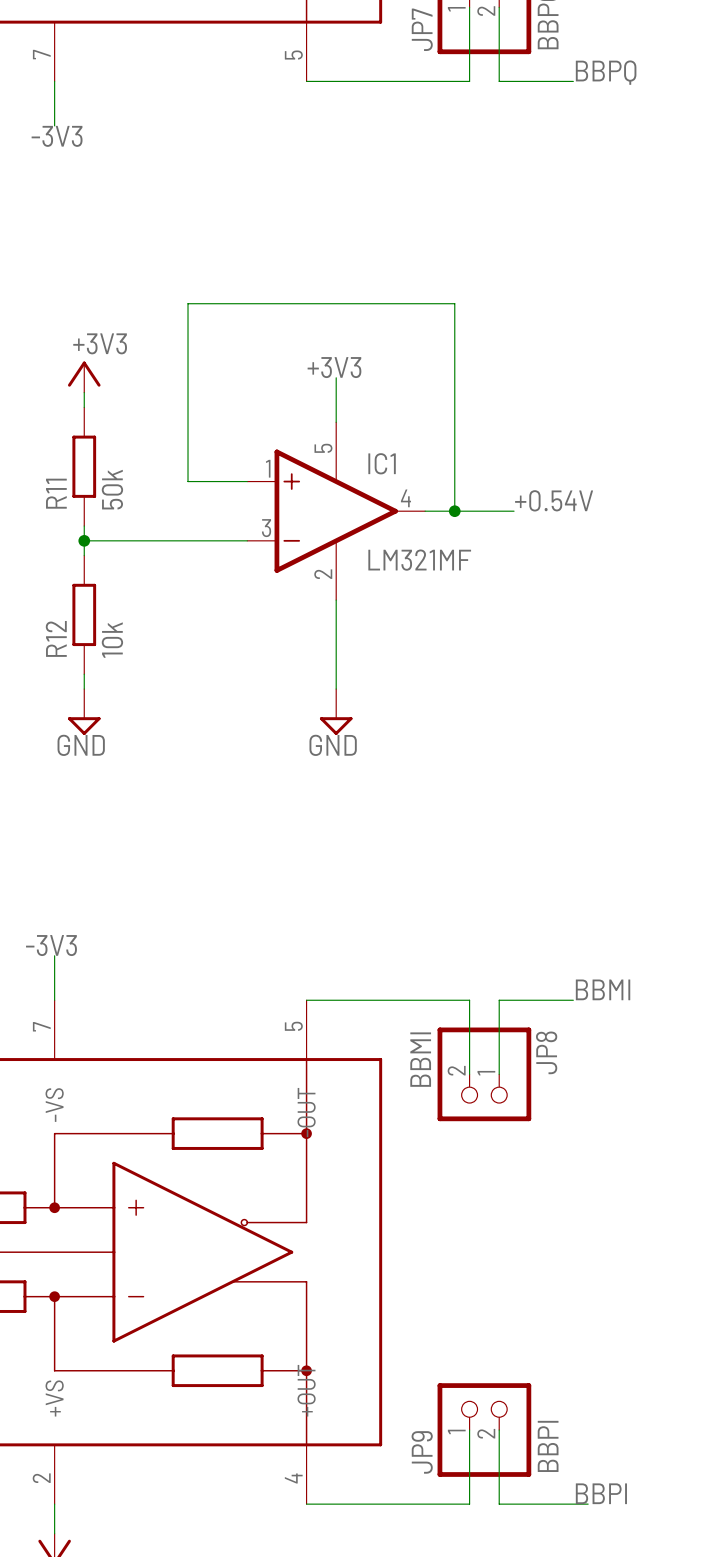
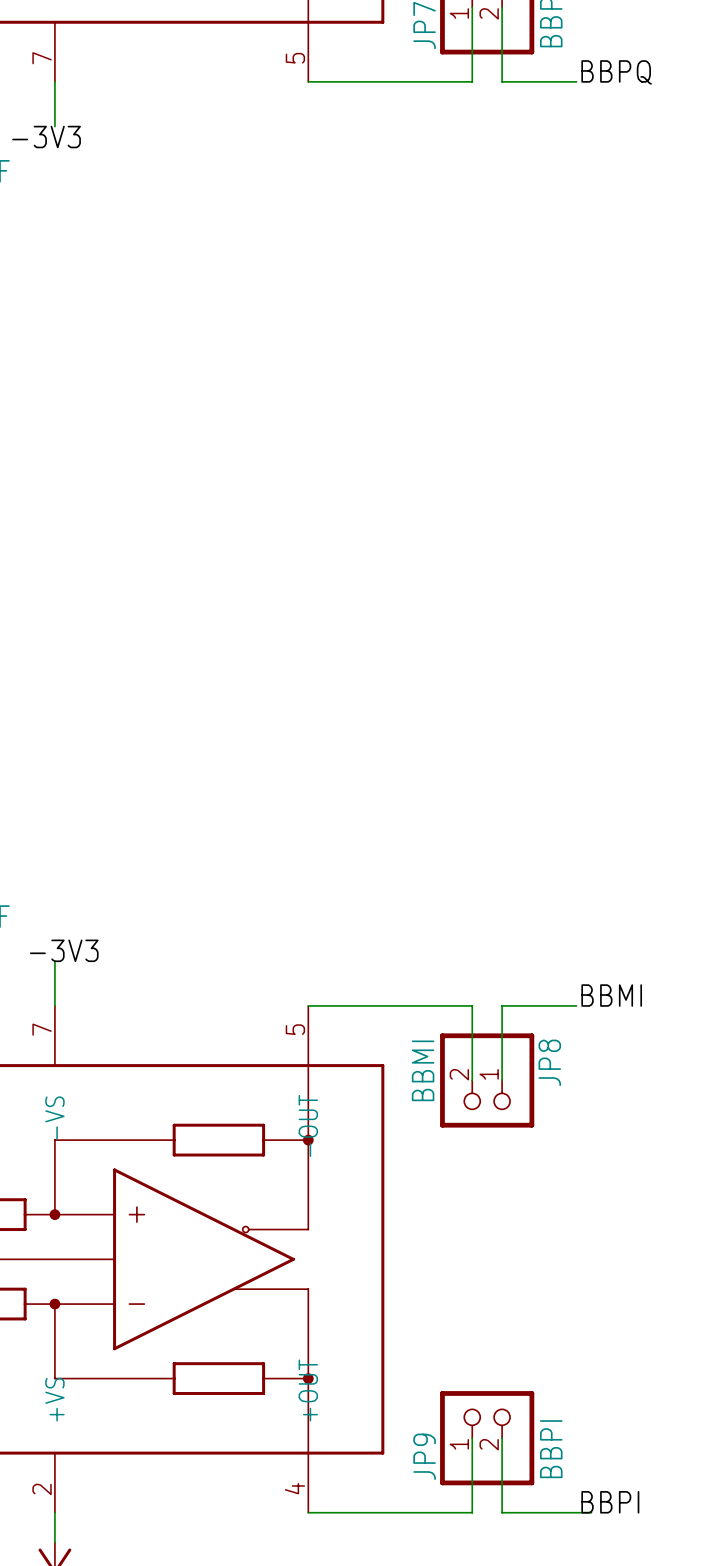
label: +3V3 (334, 367) -> none
power symbol: +3V3 (84, 377) -> none
wire: (336, 377) (336, 422) -> none
wire: (84, 392) (84, 407) -> none
R11: 50k (84, 466) -> none
wire: (247, 481) (188, 481) (188, 303) (454, 303) (454, 511) -> none
label: +0.54V (554, 500) -> none
IC1: LM321MF (336, 511) -> none
wire: (425, 511) (514, 511) -> none
junction: (454, 511) -> none
wire: (84, 526) (84, 555) -> none
wire: (84, 540) (247, 540) -> none
junction: (84, 540) -> none
wire: (336, 600) (336, 689) -> none
R12: 10k (84, 614) -> none
wire: (84, 674) (84, 689) -> none
power symbol: GND (84, 712) -> none
power symbol: GND (336, 712) -> none

